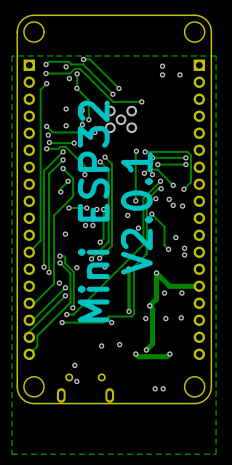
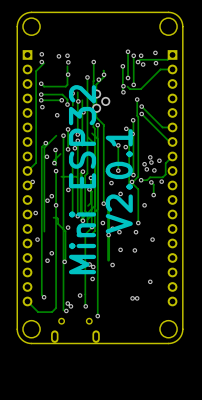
zone outline: (216, 55) (216, 454) (11, 454) (11, 55) (216, 55) -> none
track: (83, 59) (89, 59) (119, 88) -> none
via: (83, 59) -> none
track: none -> (128, 51) (128, 78)
via: none -> (128, 51)
via: none -> (155, 52)
track: (46, 64) (48, 61) (68, 61) (71, 64) (83, 64) (112, 94) -> none
track: none -> (172, 54) (167, 59) (140, 59) (138, 62)
via: none -> (67, 55)
track: none -> (133, 55) (133, 84)
via: none -> (133, 55)
track: (46, 73) (70, 73) (74, 68) (80, 68) (113, 101) (141, 101) -> none
track: (77, 73) (76, 88) (88, 100) (88, 119) -> none
track: none -> (93, 62) (94, 231) (92, 233)
via: none -> (93, 62)
via: none -> (138, 62)
track: none -> (44, 63) (36, 71) (36, 162) (27, 170)
via: (162, 74) -> none
via: none -> (143, 64)
via: (69, 78) -> none
track: none -> (67, 66) (67, 84) (65, 86) (44, 86) (41, 83)
track: none -> (122, 66) (123, 92)
via: none -> (122, 66)
track: none -> (172, 69) (160, 69) (140, 89) (130, 89) (127, 86)
track: (46, 83) (40, 89) (40, 240) (29, 252) -> none
via: (46, 83) -> none
track: none -> (103, 70) (103, 77) (96, 84) (96, 117) (103, 124) (103, 203)
track: none -> (87, 77) (87, 173) (85, 175) (85, 211) (87, 213) (87, 224)
via: none -> (87, 77)
via: none -> (128, 78)
via: none -> (41, 83)
via: none -> (133, 84)
via: (66, 109) -> none
track: none -> (77, 92) (77, 134)
via: none -> (123, 92)
track: none -> (41, 94) (62, 94) (67, 99) (67, 104)
via: none -> (41, 94)
via: (131, 111) -> none
track: none -> (137, 99) (138, 176) (133, 184) (138, 189) (138, 223)
via: none -> (137, 99)
via: none -> (41, 100)
track: none -> (61, 100) (41, 100)
via: none -> (61, 100)
track: none -> (82, 100) (82, 145)
via: none -> (67, 104)
via: (82, 124) -> none
via: (66, 125) -> none
track: none -> (141, 106) (162, 127) (172, 127)
via: none -> (141, 106)
track: (46, 126) (52, 132) (94, 132) -> none
via: (131, 127) -> none
track: none -> (141, 113) (169, 141) (172, 141)
via: none -> (141, 113)
via: (48, 135) -> none
via: none -> (57, 115)
track: none -> (133, 120) (133, 175)
via: none -> (133, 120)
track: (49, 142) (74, 143) -> none
via: (49, 142) -> none
via: (74, 143) -> none
track: none -> (97, 125) (97, 316)
via: none -> (97, 125)
track: (46, 148) (65, 146) (84, 166) (84, 174) -> none
via: (46, 148) -> none
track: (63, 151) (44, 170) (44, 267) -> none
via: (63, 151) -> none
track: (136, 151) (135, 171) -> none
via: (136, 151) -> none
track: (145, 151) (187, 151) (190, 155) (190, 182) (183, 189) -> none
track: none -> (68, 129) (68, 149)
via: none -> (68, 129)
track: none -> (129, 129) (129, 185)
via: (104, 157) -> none
track: (185, 157) (152, 157) -> none
via: (185, 157) -> none
via: none -> (77, 134)
via: (63, 159) -> none
track: none -> (63, 135) (63, 310)
via: none -> (63, 135)
via: (100, 161) -> none
via: (157, 164) -> none
track: (185, 164) (157, 164) -> none
via: (185, 164) -> none
track: none -> (77, 140) (77, 216)
via: none -> (77, 140)
track: none -> (45, 143) (41, 147) (41, 294) (44, 297)
via: none -> (45, 143)
track: (63, 168) (73, 178) (73, 196) (54, 215) (54, 283) (34, 303) (29, 303) -> none
via: (63, 168) -> none
via: none -> (118, 145)
track: (144, 173) (148, 169) (157, 169) (173, 185) -> none
via: (152, 174) -> none
via: none -> (68, 149)
via: none -> (55, 149)
track: none -> (56, 149) (56, 165)
via: (68, 181) -> none
track: (160, 181) (143, 198) (143, 244) (73, 314) (66, 314) -> none
via: (160, 181) -> none
via: none -> (46, 156)
track: none -> (172, 156) (165, 163) (165, 174) (162, 177) (150, 177) (147, 180) (141, 180)
track: (161, 188) (158, 188) (146, 200) (146, 253) (134, 266) (134, 313) (131, 316) (108, 316) (102, 322) (62, 322) -> none
via: (161, 188) -> none
via: none -> (151, 162)
via: none -> (144, 164)
track: none -> (73, 165) (72, 211)
via: (155, 198) -> none
via: none -> (154, 170)
via: none -> (56, 171)
track: none -> (82, 171) (81, 173) (82, 220)
via: none -> (82, 171)
via: (173, 205) -> none
via: none -> (133, 175)
via: (182, 206) -> none
via: (68, 207) -> none
via: (86, 208) -> none
via: (96, 209) -> none
via: none -> (141, 180)
via: none -> (161, 181)
via: none -> (32, 181)
track: (151, 214) (164, 226) (164, 245) (168, 249) -> none
track: none -> (151, 182) (153, 184) (153, 195)
via: none -> (151, 182)
track: none -> (89, 189) (91, 191) (91, 227) (85, 234) (85, 306)
via: none -> (89, 189)
via: none -> (68, 189)
via: (85, 225) -> none
via: (92, 225) -> none
via: none -> (153, 195)
via: none -> (51, 196)
via: (65, 234) -> none
track: none -> (108, 199) (108, 260)
via: none -> (47, 200)
via: (175, 237) -> none
via: none -> (103, 203)
via: none -> (56, 205)
via: none -> (144, 205)
via: (100, 242) -> none
via: (184, 248) -> none
via: (168, 249) -> none
via: none -> (35, 213)
via: none -> (77, 216)
via: (184, 254) -> none
via: (59, 256) -> none
via: (91, 258) -> none
via: (99, 258) -> none
via: none -> (82, 220)
track: (60, 262) (70, 273) (70, 302) (37, 335) (37, 346) (29, 354) -> (56, 171) (56, 308) (52, 312) (38, 312) (27, 301)
via: (60, 262) -> none
via: none -> (102, 223)
via: none -> (138, 223)
via: (44, 267) -> none
track: (129, 269) (129, 311) -> none
via: (49, 272) -> none
via: none -> (119, 232)
via: none -> (108, 235)
via: none -> (37, 239)
via: none -> (152, 239)
via: (59, 283) -> none
track: (199, 286) (169, 286) (156, 273) (156, 299) (149, 305) (152, 308) (152, 343) (146, 350) -> none
track: (65, 287) (32, 320) (29, 320) -> none
via: (65, 287) -> none
via: none -> (120, 249)
via: (164, 293) -> none
via: (181, 293) -> none
via: none -> (134, 250)
track: (65, 295) (29, 331) (29, 337) -> none
via: (65, 295) -> none
via: none -> (51, 253)
via: (149, 305) -> none
via: none -> (47, 260)
via: none -> (89, 264)
via: none -> (93, 266)
via: (66, 314) -> none
via: (181, 317) -> none
via: (145, 318) -> none
via: (165, 318) -> none
via: (62, 322) -> none
via: (111, 322) -> none
via: none -> (92, 278)
via: none -> (150, 281)
via: (119, 344) -> none
via: (101, 345) -> none
via: none -> (80, 295)
via: none -> (44, 297)
via: (146, 350) -> none
via: none -> (132, 298)
via: none -> (137, 298)
via: (135, 354) -> none
track: (169, 354) (167, 356) (138, 356) (135, 354) -> none
via: (169, 354) -> none
via: none -> (67, 303)
via: none -> (70, 306)
via: none -> (85, 306)
via: none -> (97, 316)
via: (76, 381) -> none
via: (155, 388) -> none
via: (163, 388) -> none

